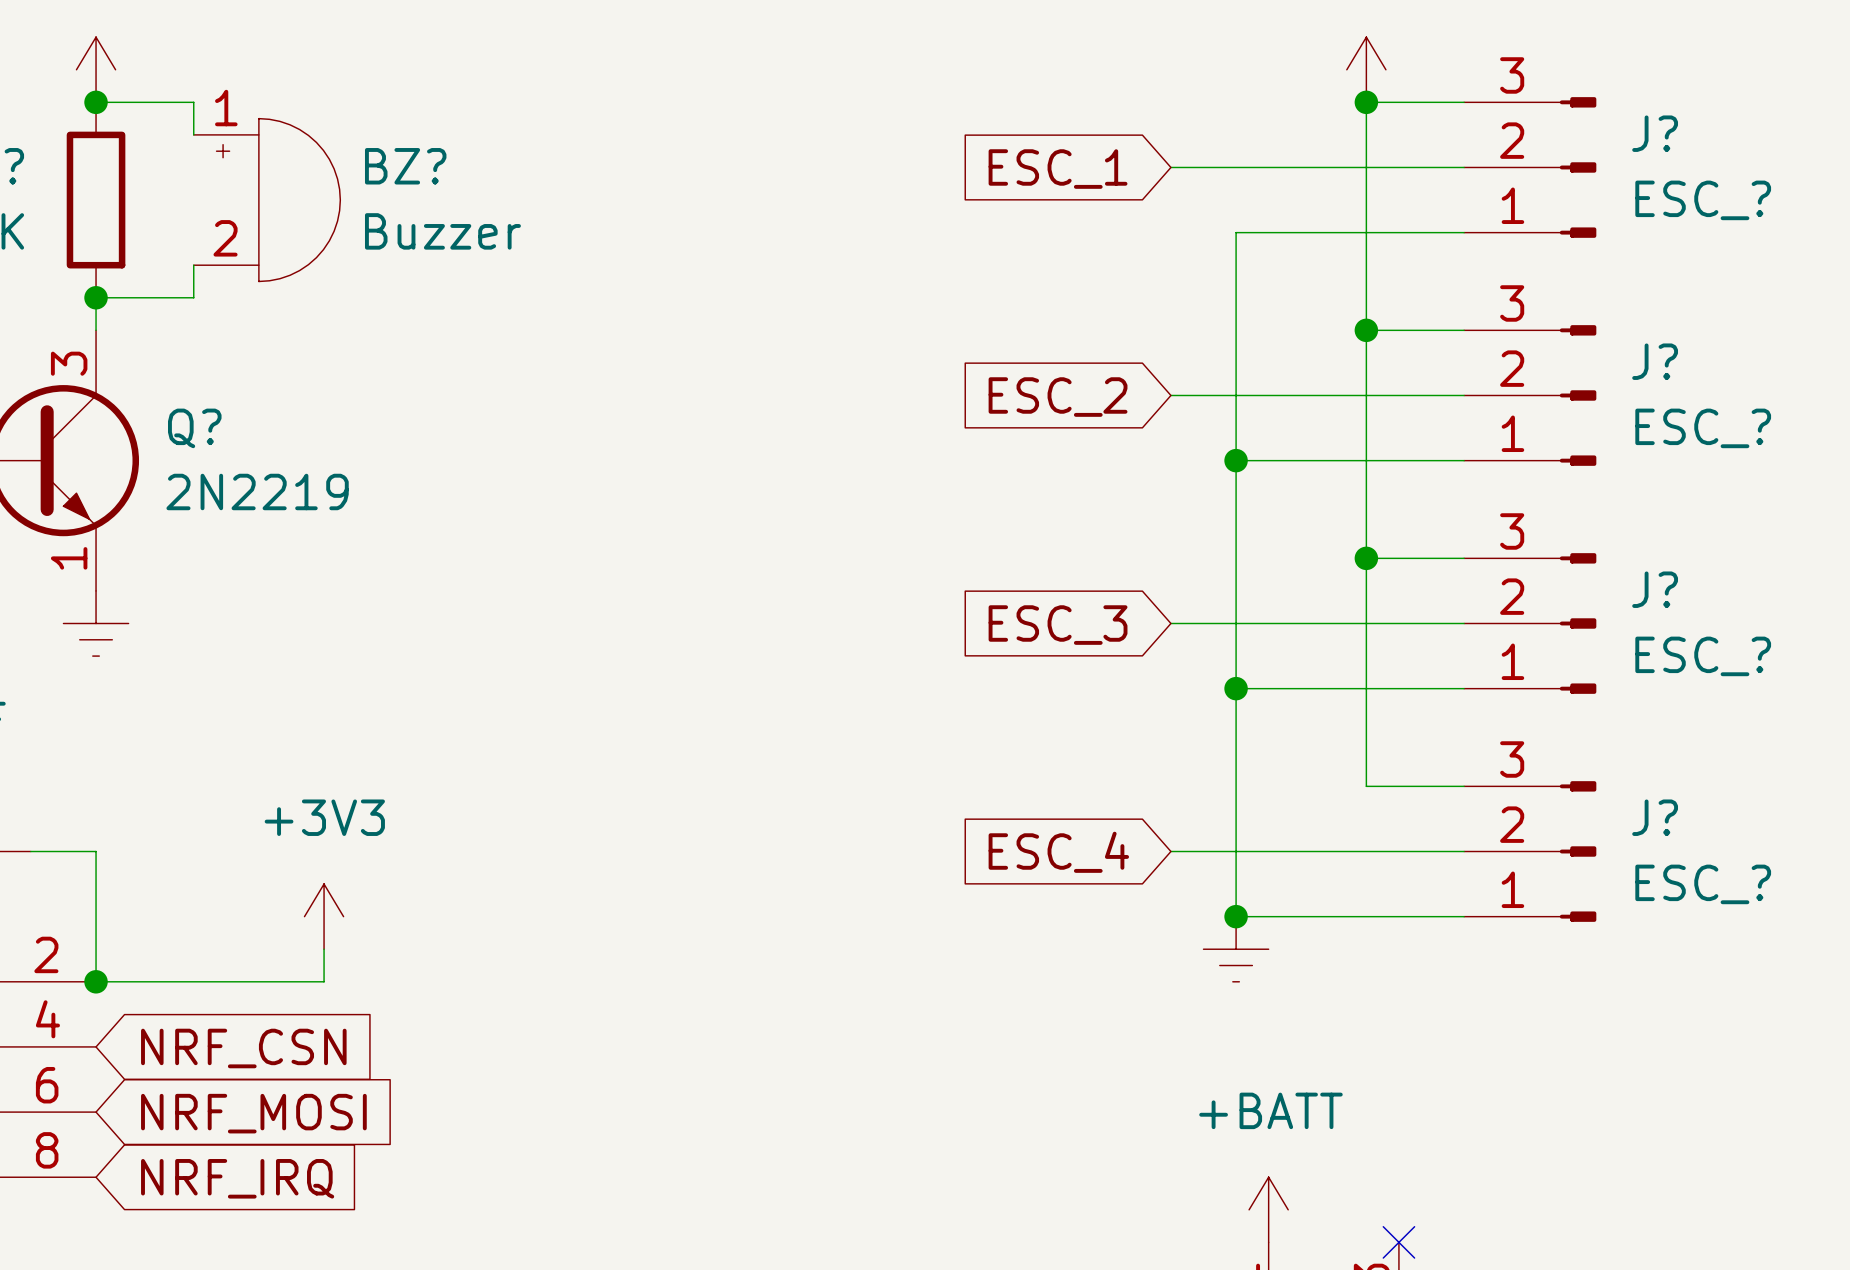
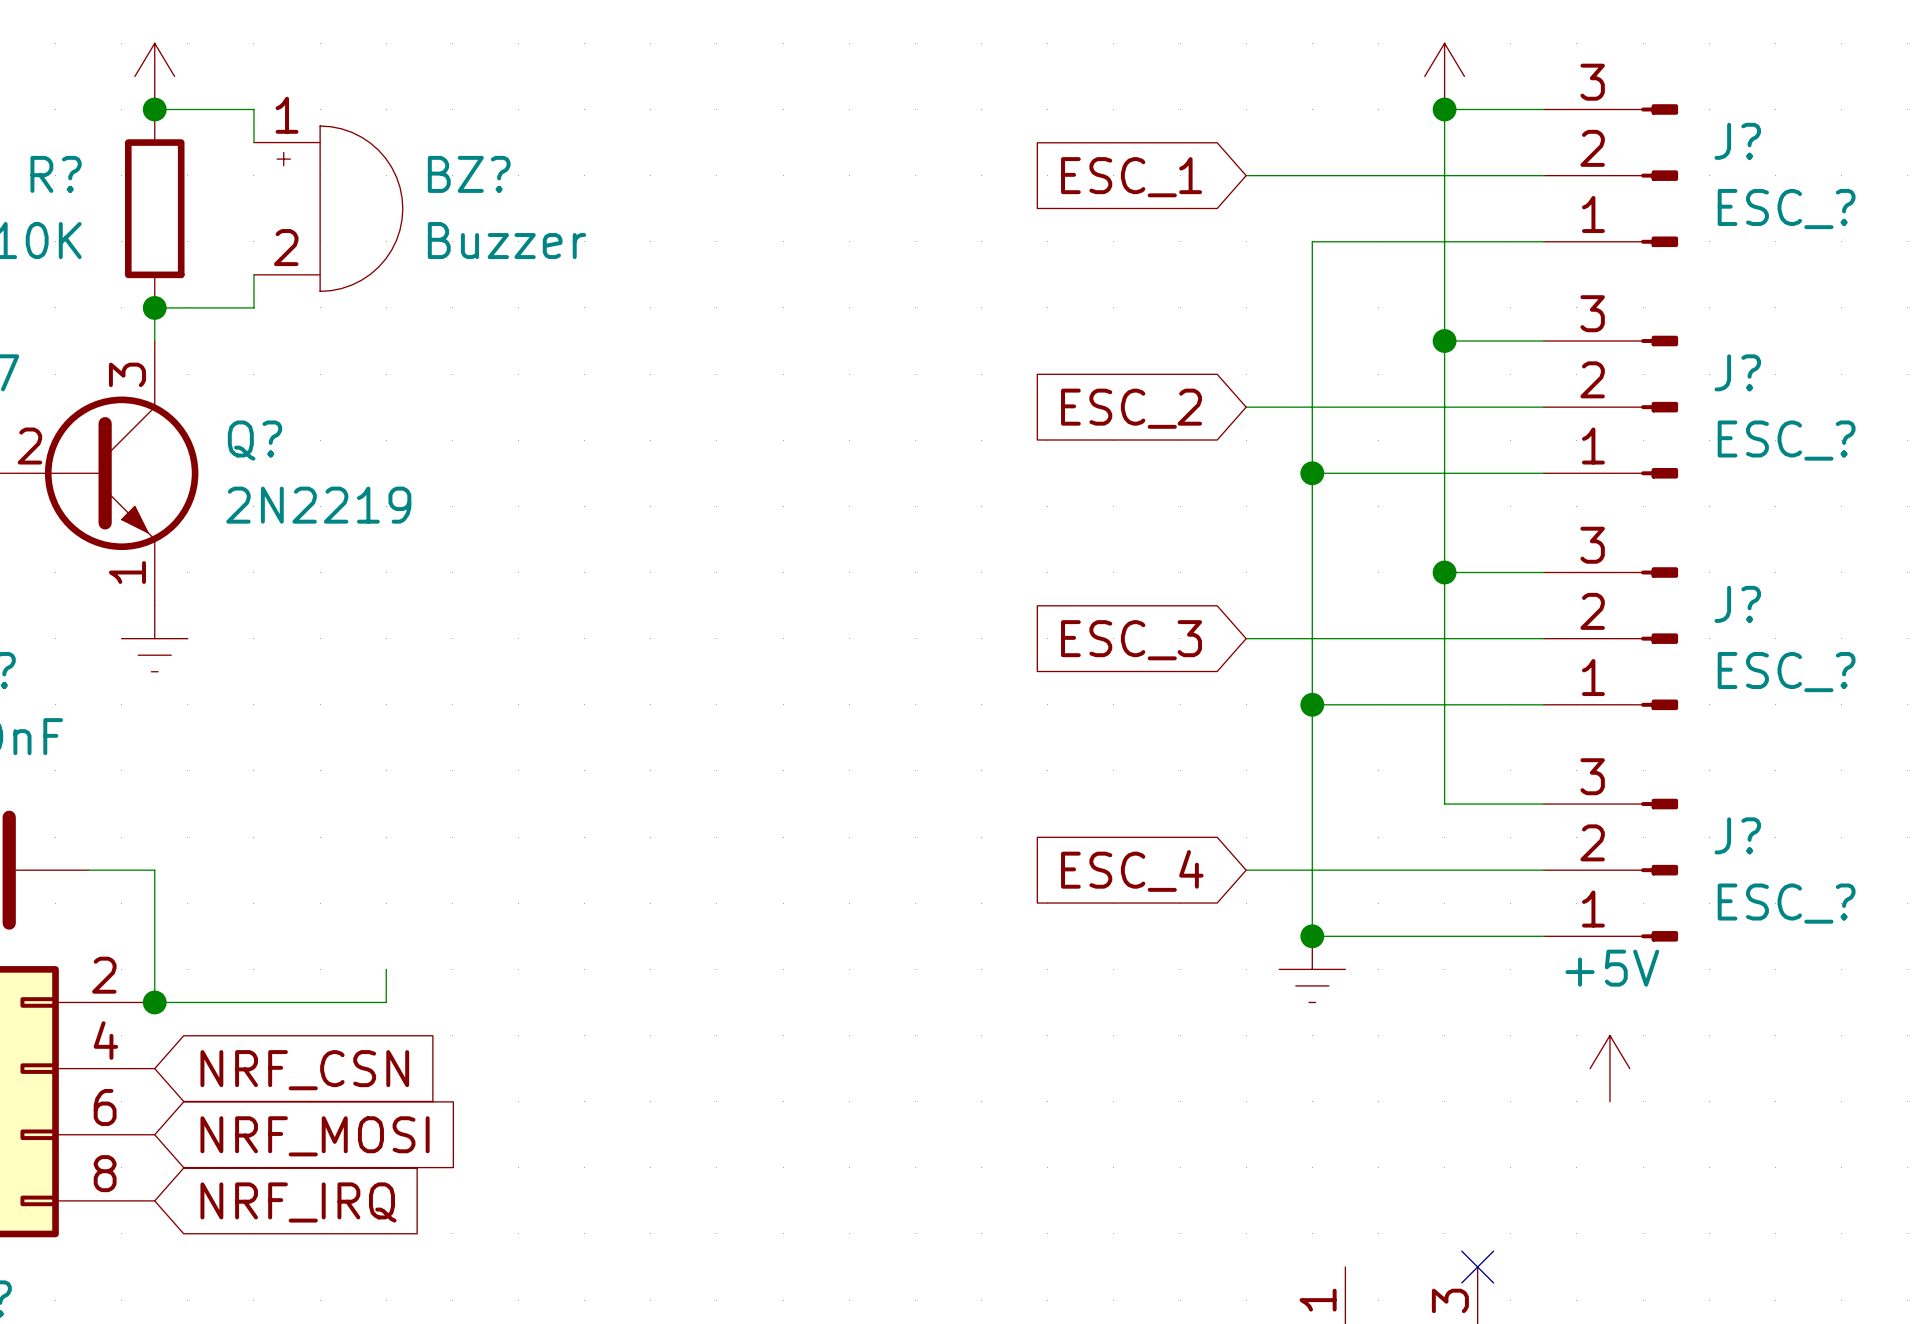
power symbol: +3V3 (324, 916) -> none
power symbol: none -> +5V (1609, 1068)
power symbol: +BATT (1268, 1209) -> none

